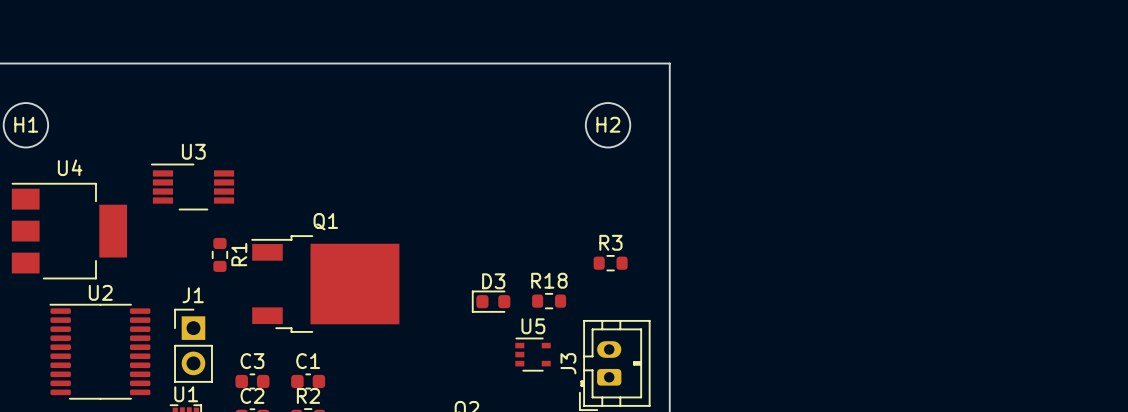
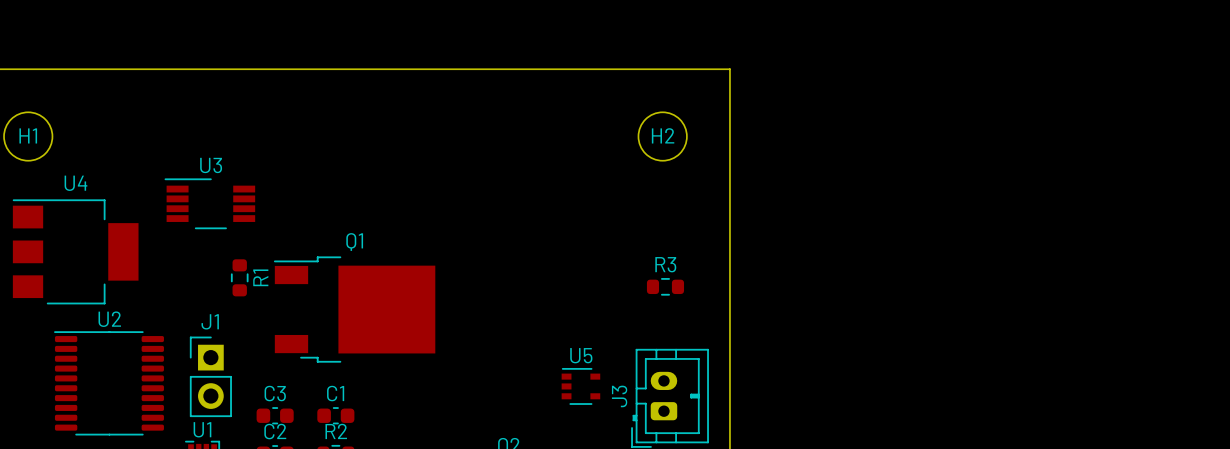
D3: (491, 301) -> none
R18: (549, 301) -> none

